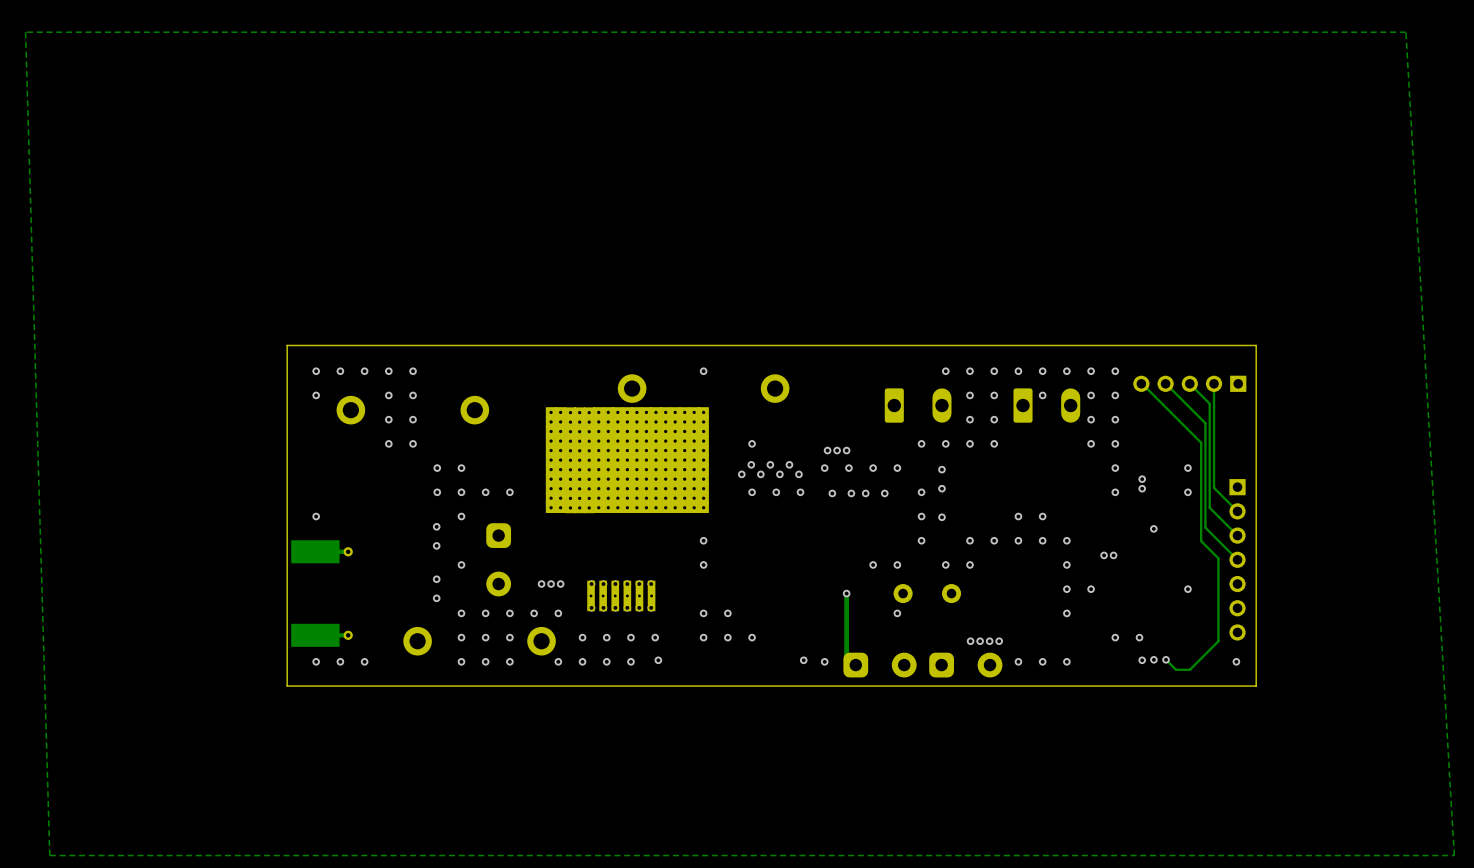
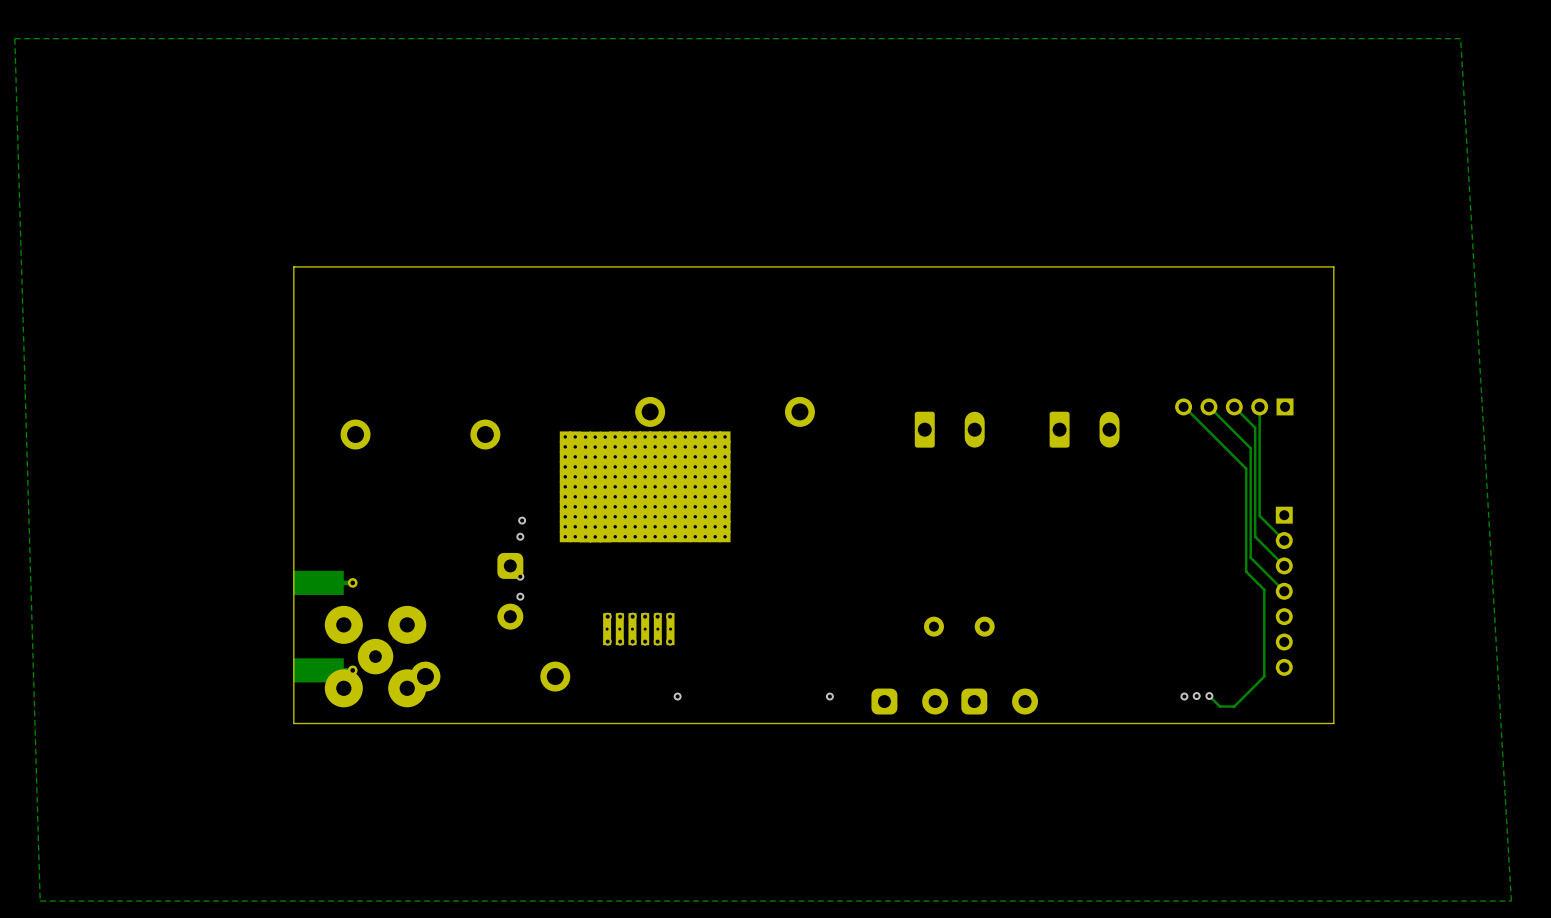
via: (316, 371) -> none
via: (340, 371) -> none
via: (364, 371) -> none
via: (388, 371) -> none
via: (413, 371) -> none
via: (703, 371) -> none
via: (945, 371) -> none
via: (970, 371) -> none
via: (994, 371) -> none
via: (1018, 371) -> none
via: (1042, 371) -> none
via: (1066, 371) -> none
via: (1091, 371) -> none
via: (1115, 371) -> none
via: (316, 395) -> none
via: (388, 395) -> none
via: (413, 395) -> none
via: (970, 395) -> none
via: (994, 395) -> none
via: (1042, 395) -> none
via: (1091, 395) -> none
via: (1115, 395) -> none
via: (388, 419) -> none
via: (413, 419) -> none
via: (970, 419) -> none
via: (994, 419) -> none
via: (1091, 419) -> none
via: (1115, 419) -> none
via: (388, 443) -> none
via: (413, 443) -> none
via: (752, 443) -> none
via: (921, 443) -> none
via: (945, 443) -> none
via: (970, 443) -> none
via: (994, 443) -> none
via: (1091, 443) -> none
via: (1115, 443) -> none
via: (827, 450) -> none
via: (837, 450) -> none
via: (846, 450) -> none
via: (751, 464) -> none
via: (770, 464) -> none
via: (789, 464) -> none
via: (437, 468) -> none
via: (461, 468) -> none
via: (824, 468) -> none
via: (848, 468) -> none
via: (873, 468) -> none
via: (897, 468) -> none
via: (1115, 468) -> none
via: (1187, 468) -> none
via: (941, 469) -> none
via: (741, 474) -> none
via: (760, 474) -> none
via: (779, 474) -> none
via: (798, 474) -> none
via: (1142, 479) -> none
via: (941, 488) -> none
via: (1142, 488) -> none
via: (437, 492) -> none
via: (461, 492) -> none
via: (485, 492) -> none
via: (752, 492) -> none
via: (776, 492) -> none
via: (800, 492) -> none
via: (921, 492) -> none
via: (1115, 492) -> none
via: (1187, 492) -> none
via: (832, 493) -> none
via: (851, 493) -> none
via: (865, 493) -> none
via: (884, 493) -> none
via: none -> (520, 536)
via: (316, 516) -> none
via: (461, 516) -> none
via: (921, 516) -> none
via: (1018, 516) -> none
via: (1042, 516) -> none
via: (941, 517) -> none
via: (436, 526) -> none
via: (1153, 528) -> none
via: (703, 540) -> none
via: (921, 540) -> none
via: (970, 540) -> none
via: (994, 540) -> none
via: (1018, 540) -> none
via: (1042, 540) -> none
via: (1066, 540) -> none
via: (436, 545) -> none
via: none -> (520, 576)
via: (1104, 555) -> none
via: (1113, 555) -> none
via: (461, 564) -> none
via: none -> (520, 596)
via: (703, 564) -> none
via: (873, 564) -> none
via: (897, 564) -> none
via: (945, 564) -> none
via: (970, 564) -> none
via: (1066, 564) -> none
via: (436, 579) -> none
via: (541, 584) -> none
via: (551, 584) -> none
via: (560, 584) -> none
via: (1066, 589) -> none
via: (1091, 589) -> none
via: (1187, 589) -> none
track: (846, 593) (846, 655) (855, 665) -> none
via: (846, 593) -> none
via: (436, 598) -> none
via: (461, 613) -> none
via: (485, 613) -> none
via: (509, 613) -> none
via: (534, 613) -> none
via: (558, 613) -> none
via: (703, 613) -> none
via: (727, 613) -> none
via: (897, 613) -> none
via: (1066, 613) -> none
part: none -> (375, 656)
via: (461, 637) -> none
via: (485, 637) -> none
via: (509, 637) -> none
via: (582, 637) -> none
via: (606, 637) -> none
via: (630, 637) -> none
via: (655, 637) -> none
via: (703, 637) -> none
via: (727, 637) -> none
via: (752, 637) -> none
via: (1115, 637) -> none
via: (1139, 637) -> none
via: (970, 641) -> none
via: (980, 641) -> none
via: (989, 641) -> none
via: (999, 641) -> none
via: (316, 661) -> none
via: (340, 661) -> none
via: (364, 661) -> none
via: (461, 661) -> none
via: (485, 661) -> none
via: (509, 661) -> none
via: (558, 661) -> none
via: (582, 661) -> none
via: (606, 661) -> none
via: (630, 661) -> none
via: (824, 661) -> none
via: (1018, 661) -> none
via: (1042, 661) -> none
via: (1066, 661) -> none
via: (1236, 661) -> none
board edge: (1256, 686) (1256, 345) (287, 345) (287, 686) (291, 686) -> (1303, 723) (1333, 723) (1333, 266) (293, 266) (293, 723)

